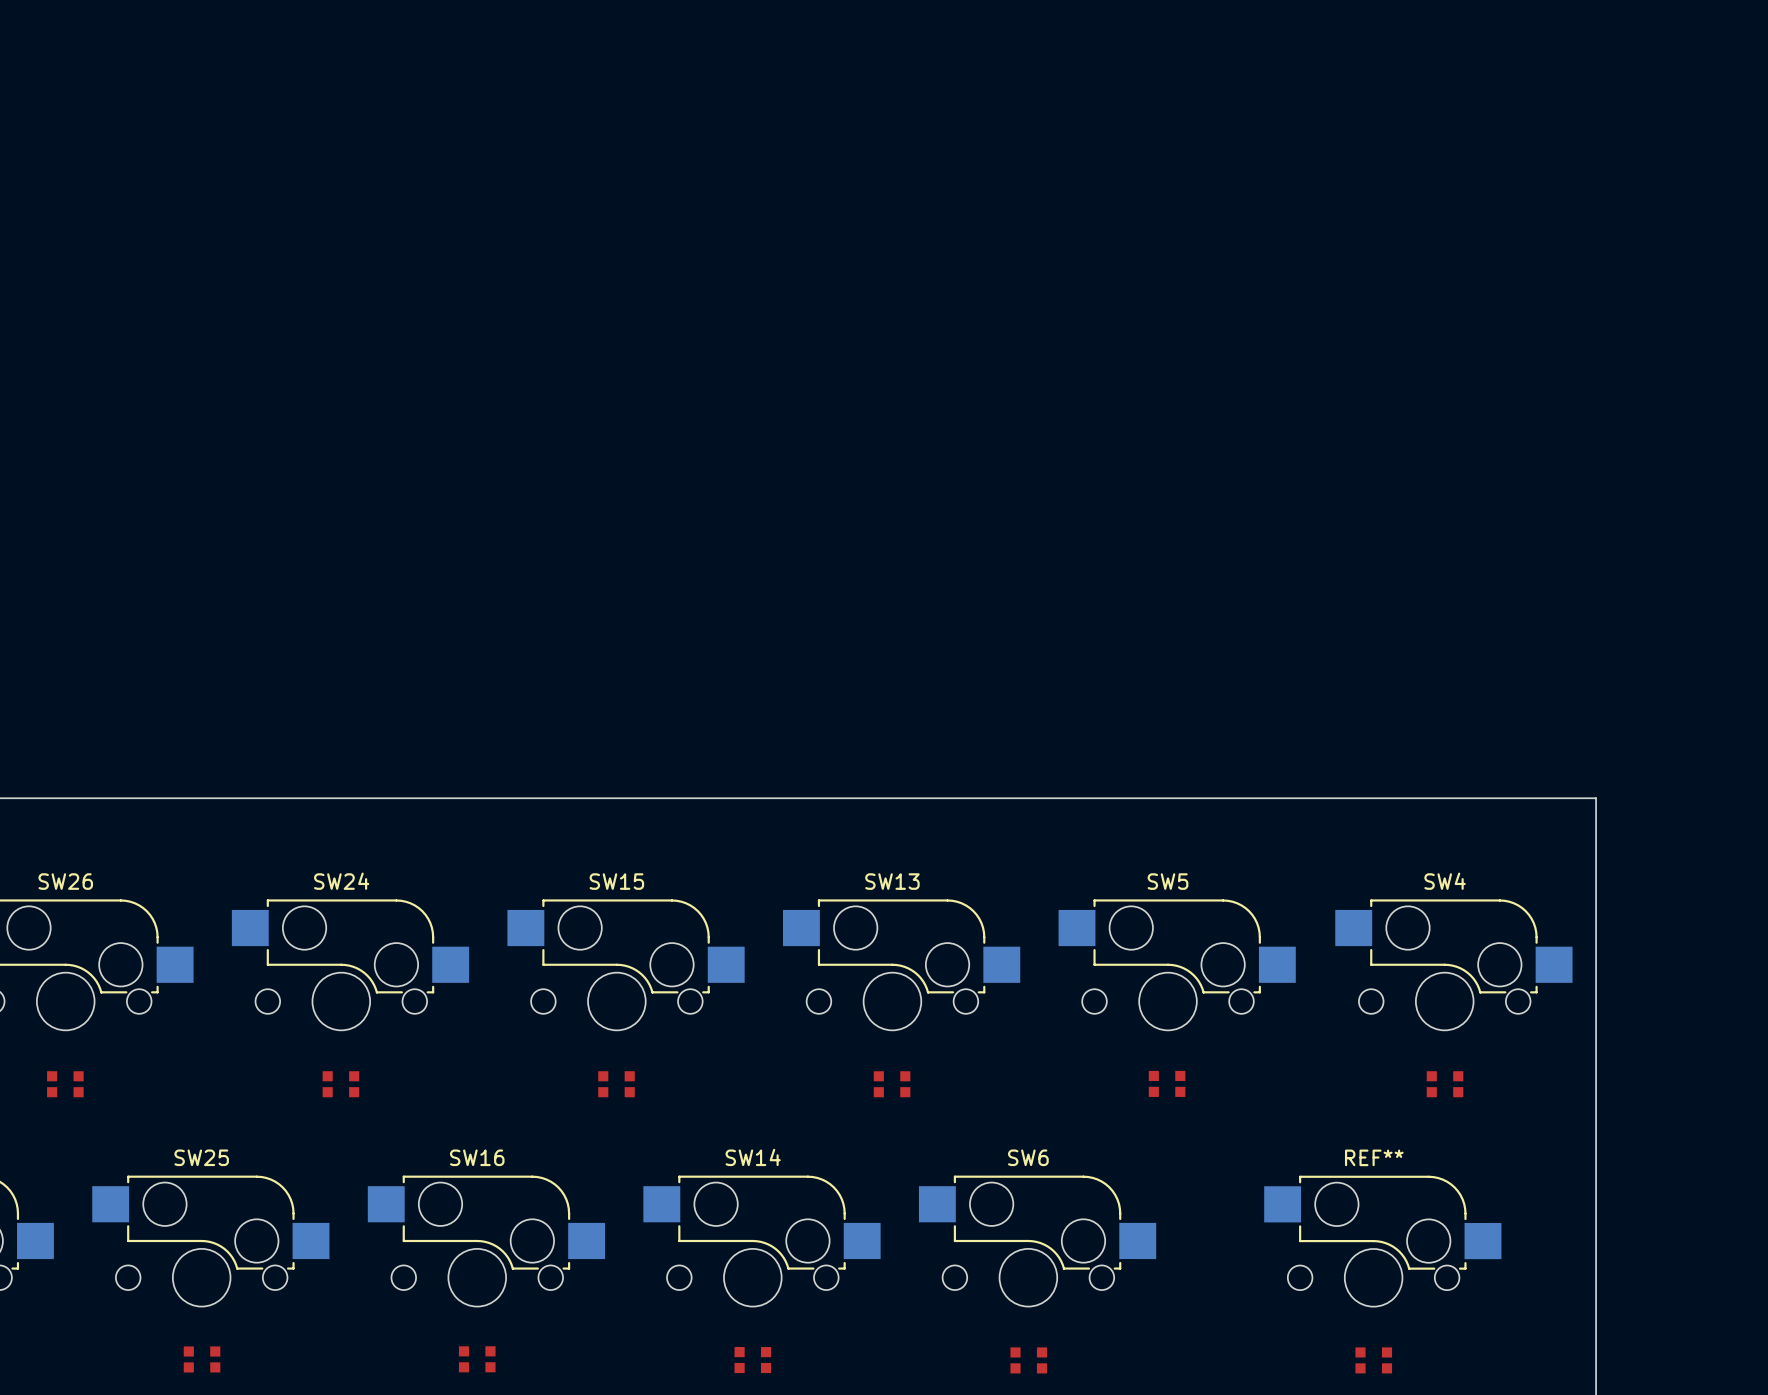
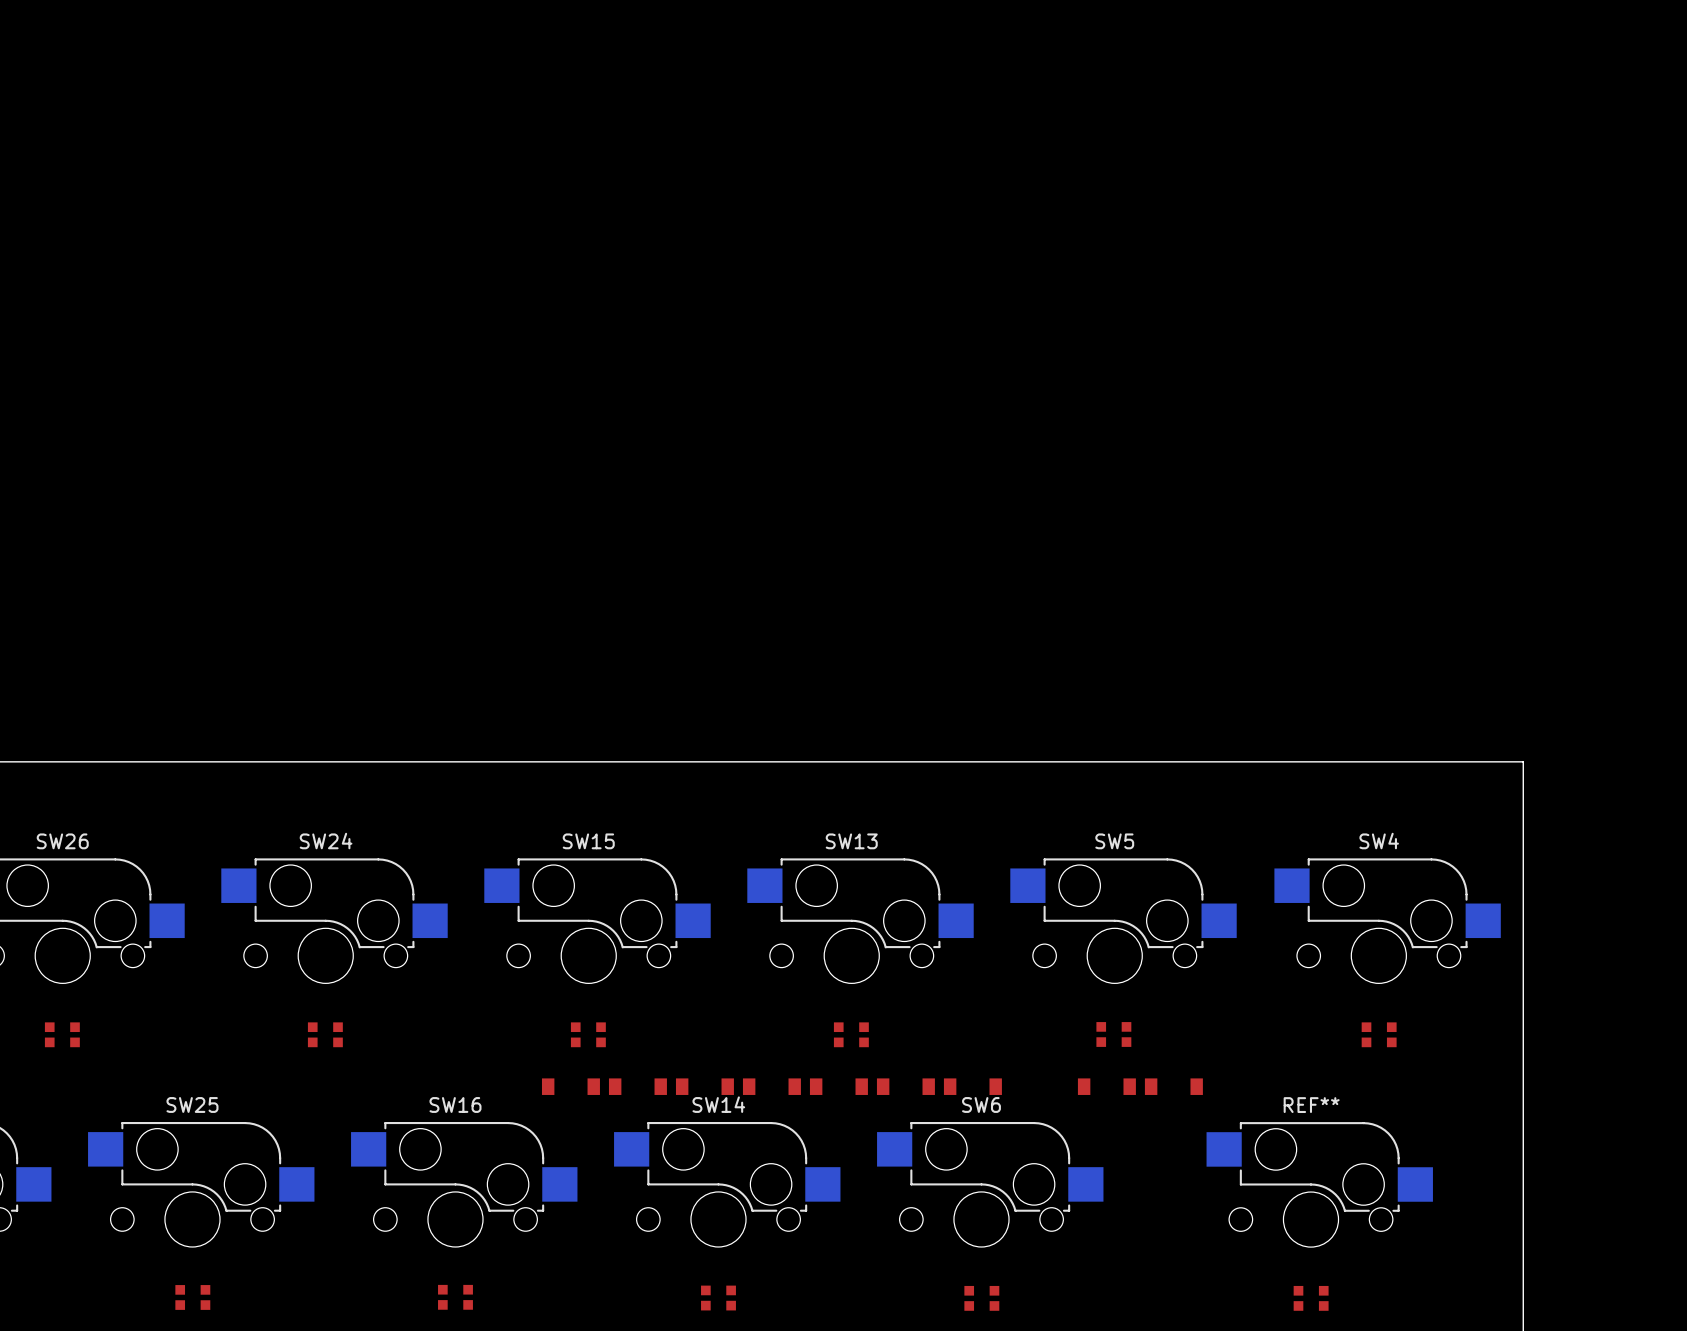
part: none -> (570, 1086)
part: none -> (637, 1086)
part: none -> (704, 1086)
part: none -> (771, 1086)
part: none -> (838, 1086)
part: none -> (905, 1086)
part: none -> (972, 1086)
part: none -> (1106, 1086)
part: none -> (1173, 1086)

